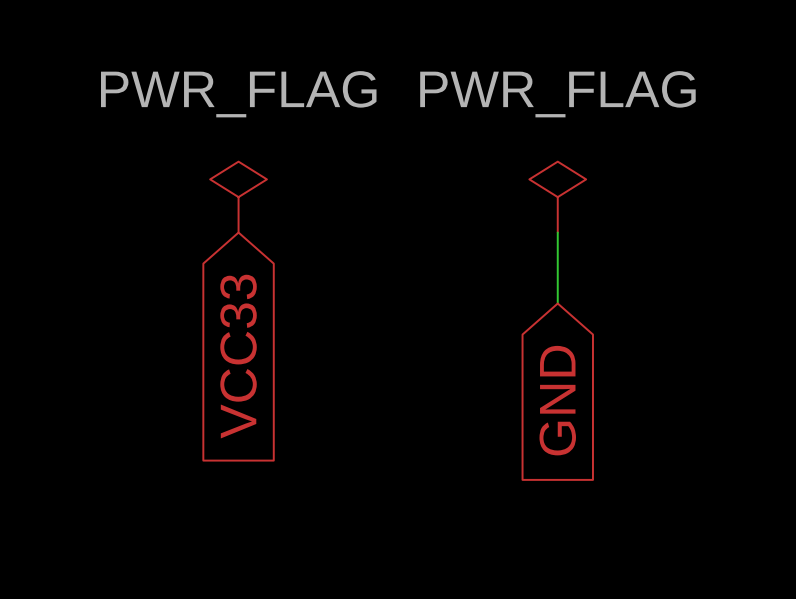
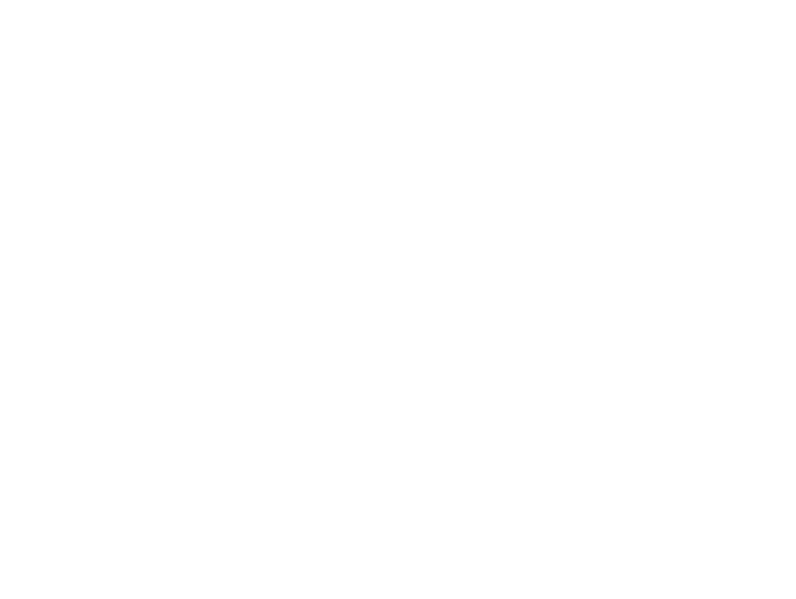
power symbol: PWR_FLAG (238, 197) -> none
power symbol: PWR_FLAG (557, 197) -> none
wire: (557, 232) (557, 303) -> none
global label: VCC33 (238, 356) -> none
global label: GND (557, 400) -> none

